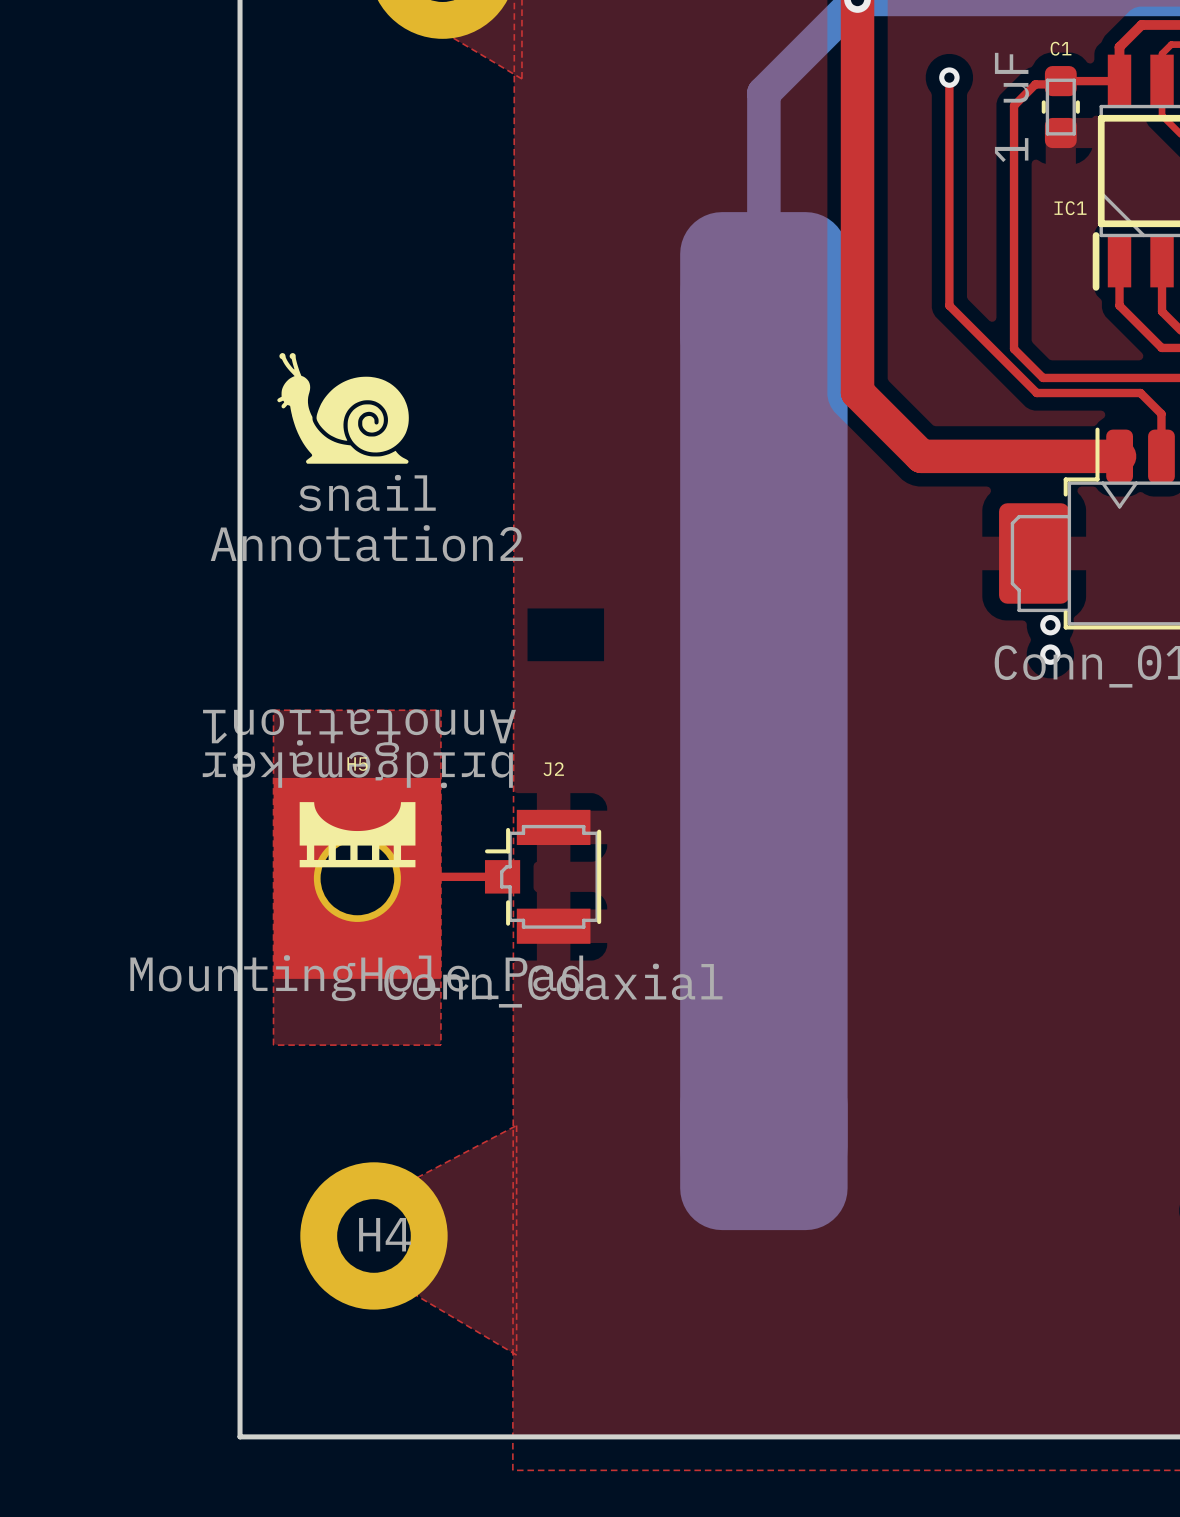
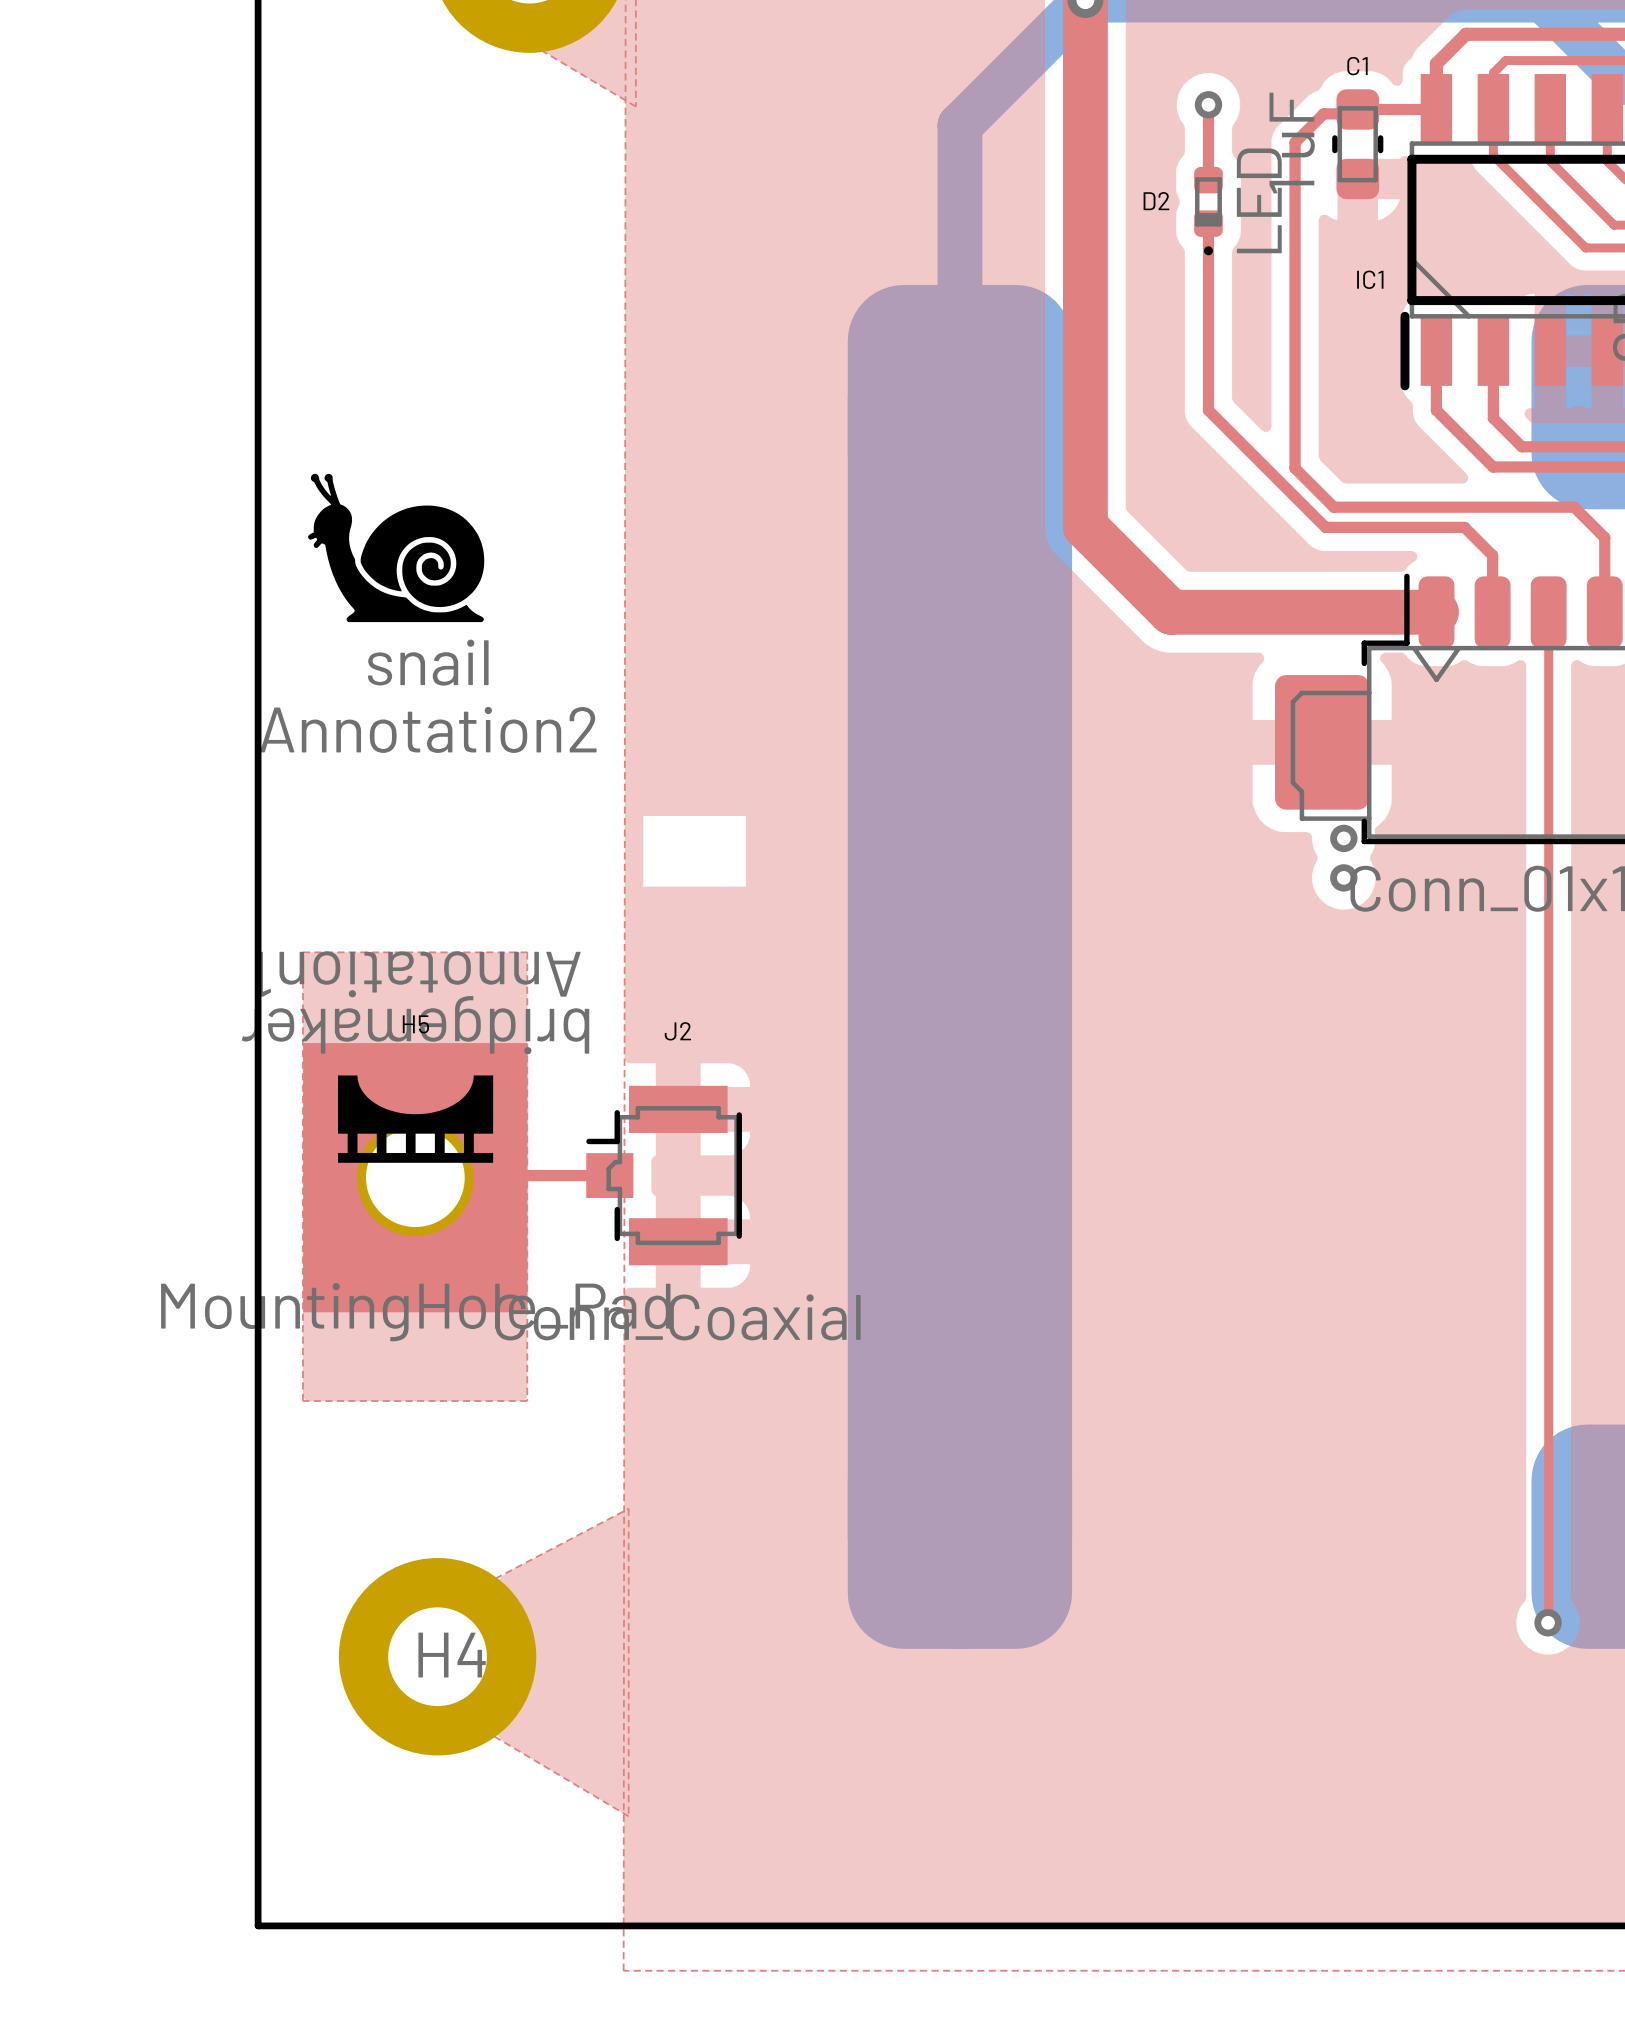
top track: (949, 133) (949, 166) -> none
D2: none -> LED (1208, 211)

